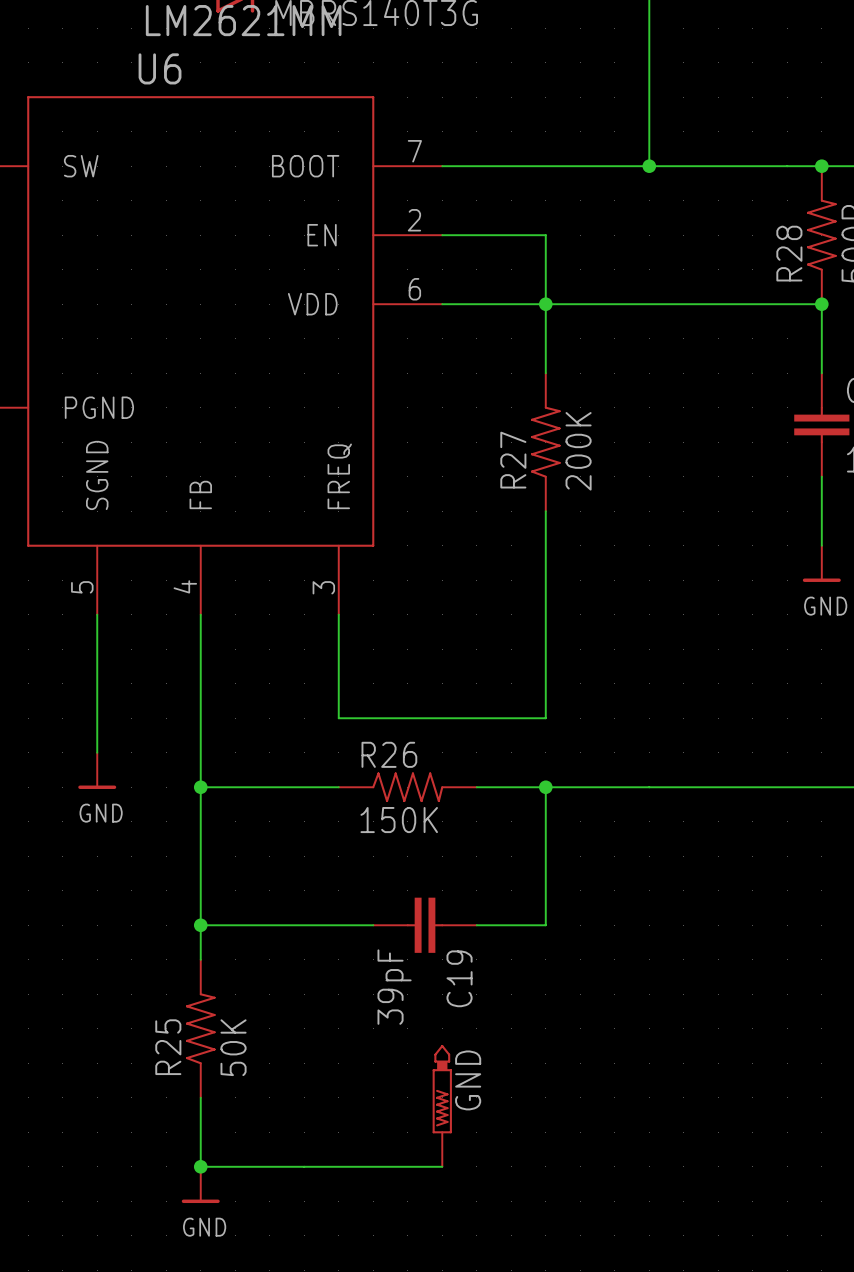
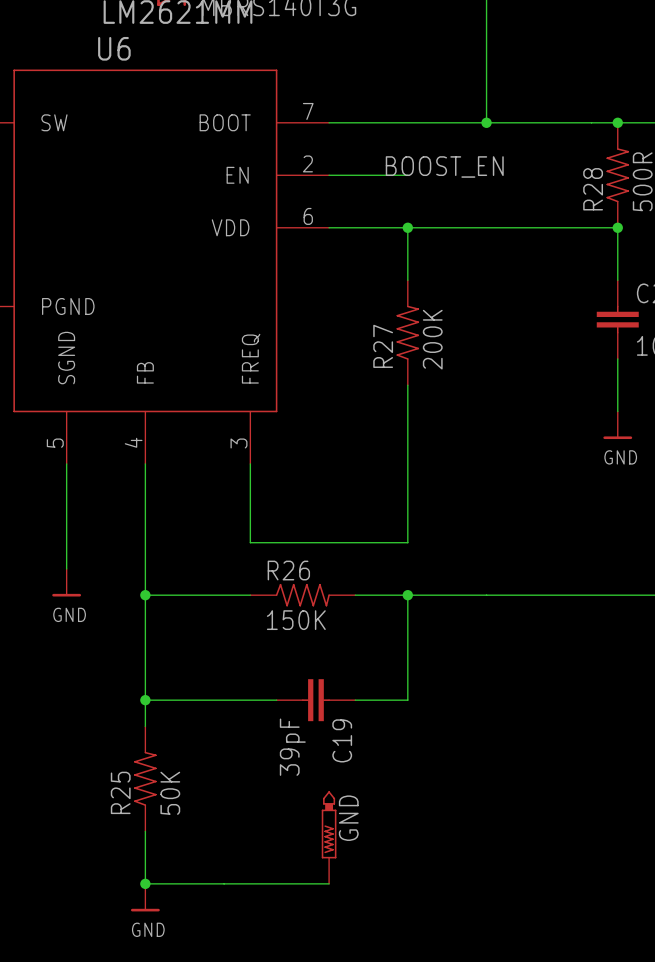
label: none -> BOOST_EN (444, 166)
wire: (545, 235) (545, 304) -> none

